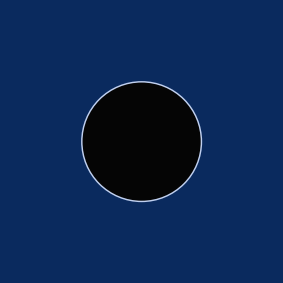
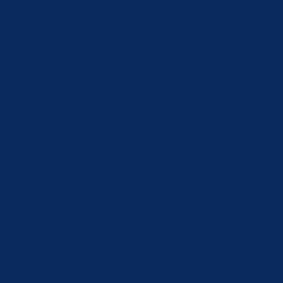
part: (141, 141) -> none

